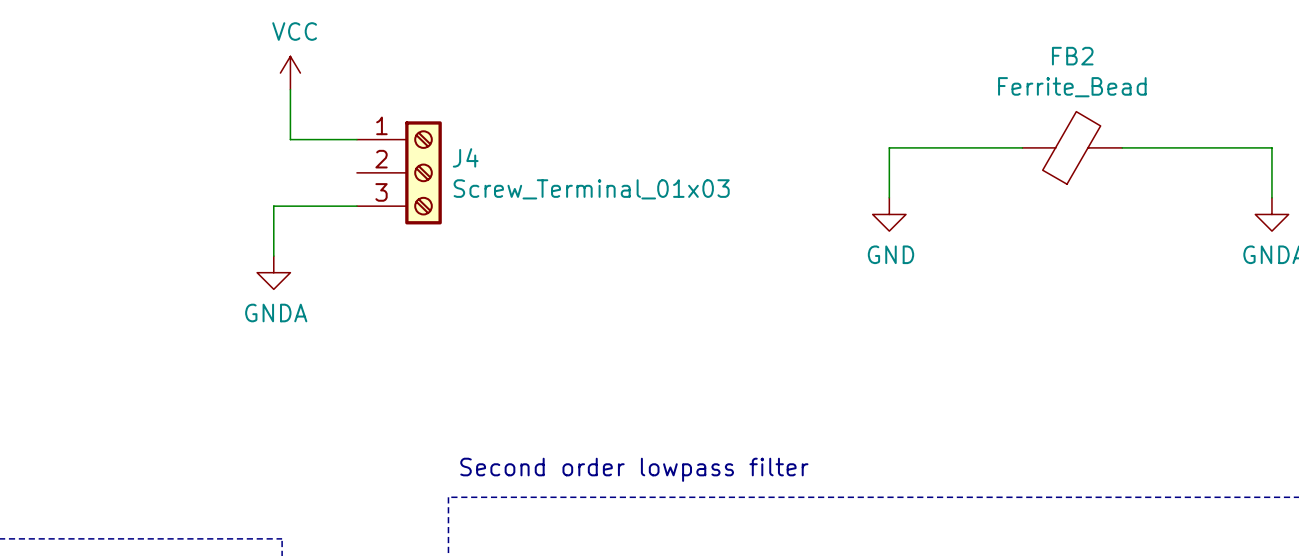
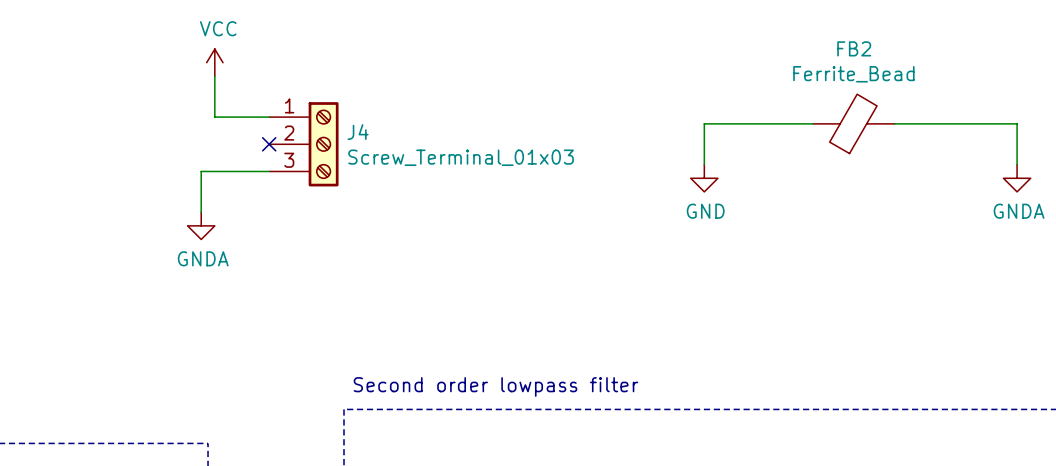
no-connect mark: none -> (269, 144)

